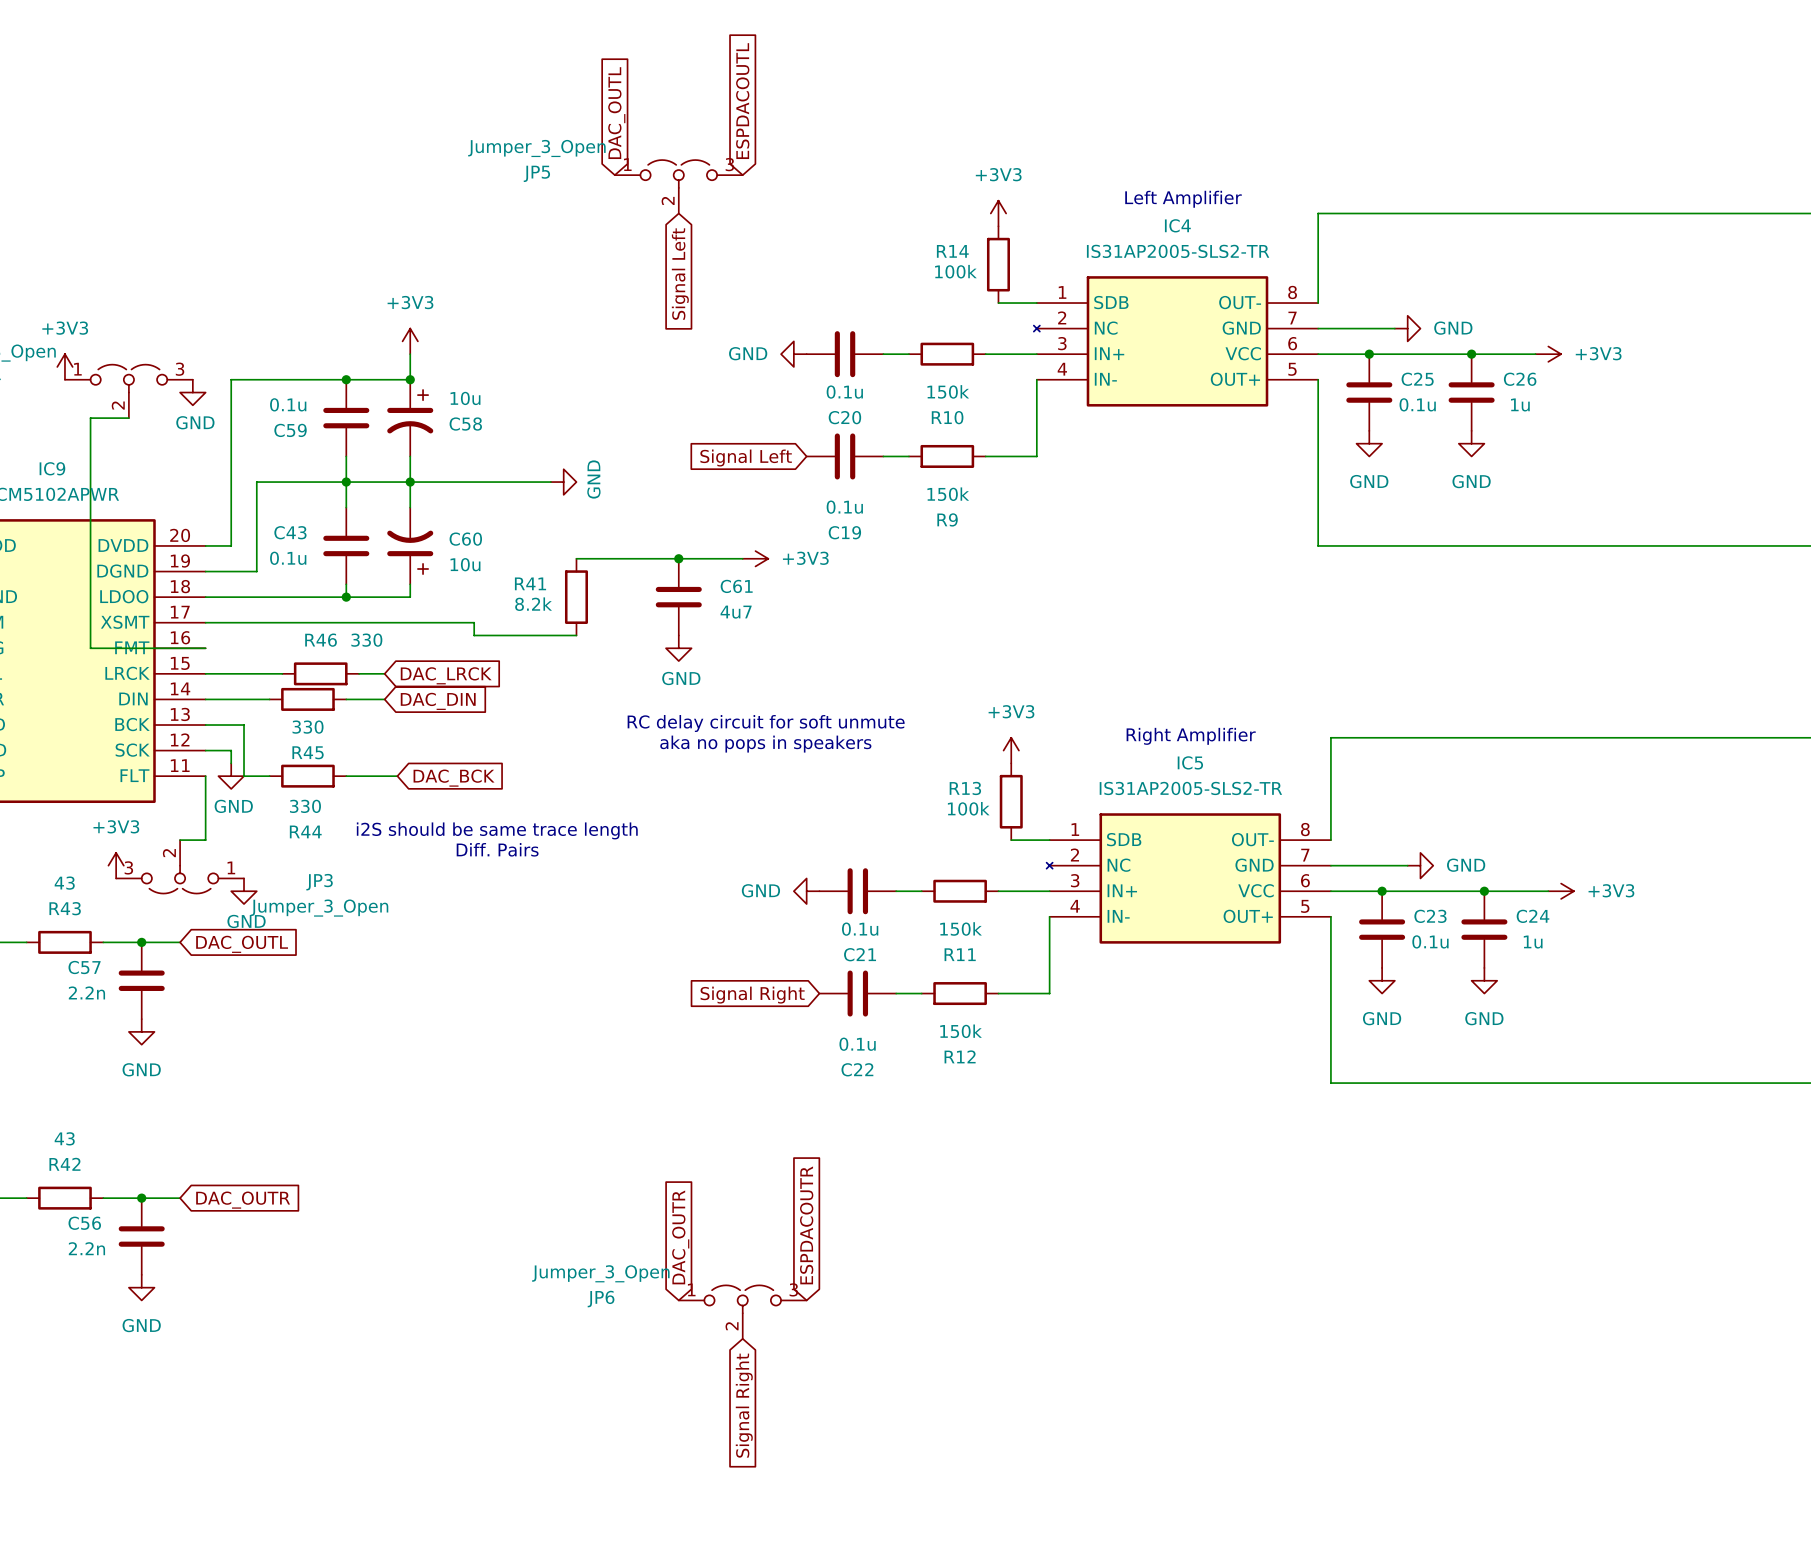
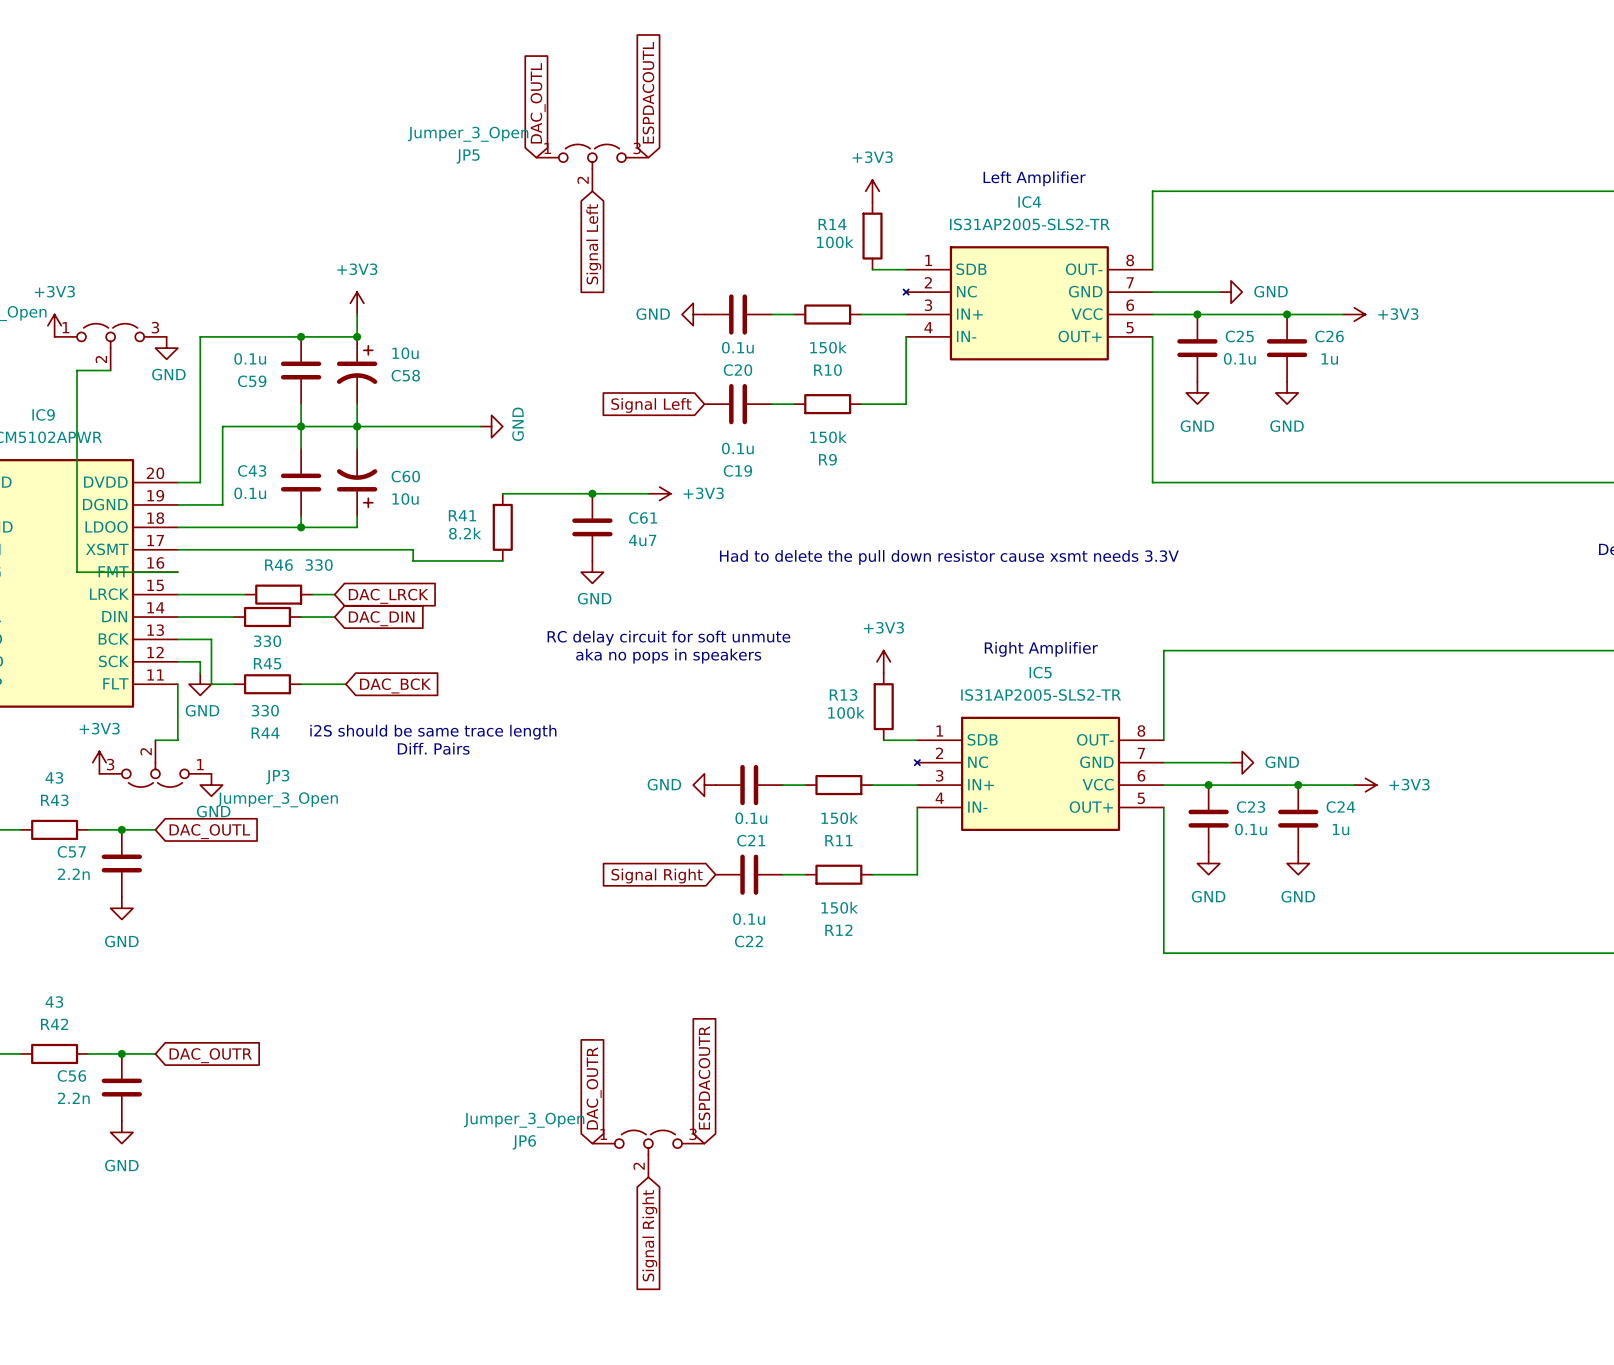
text: none -> Had to delete the pull down resistor cause xsmt needs 3.3V (949, 557)

